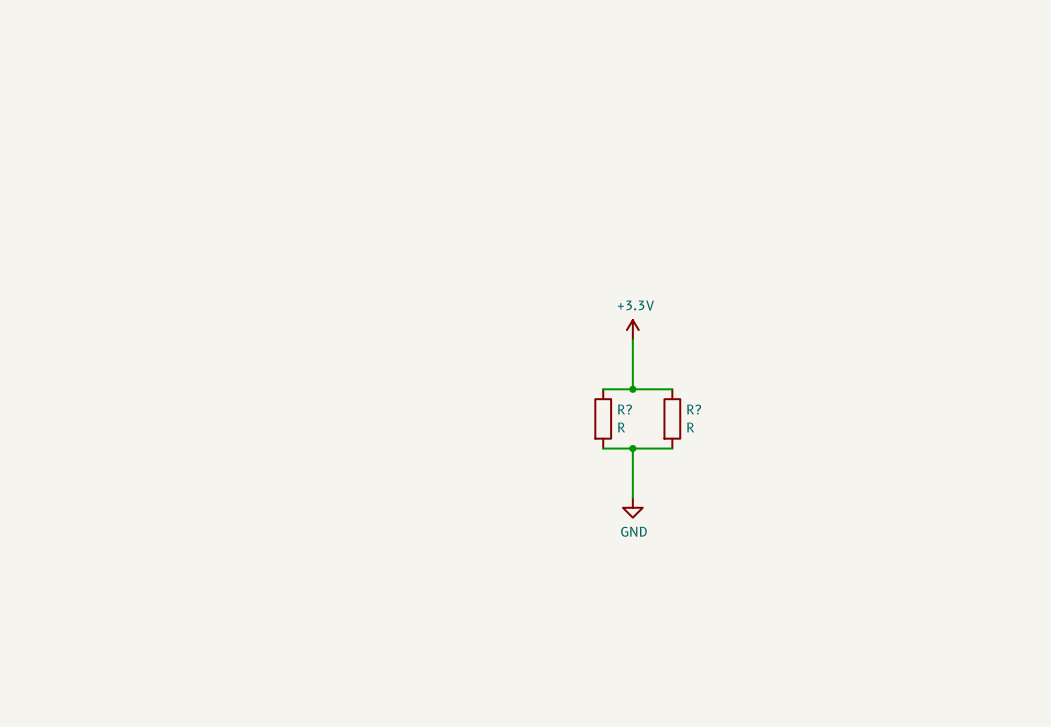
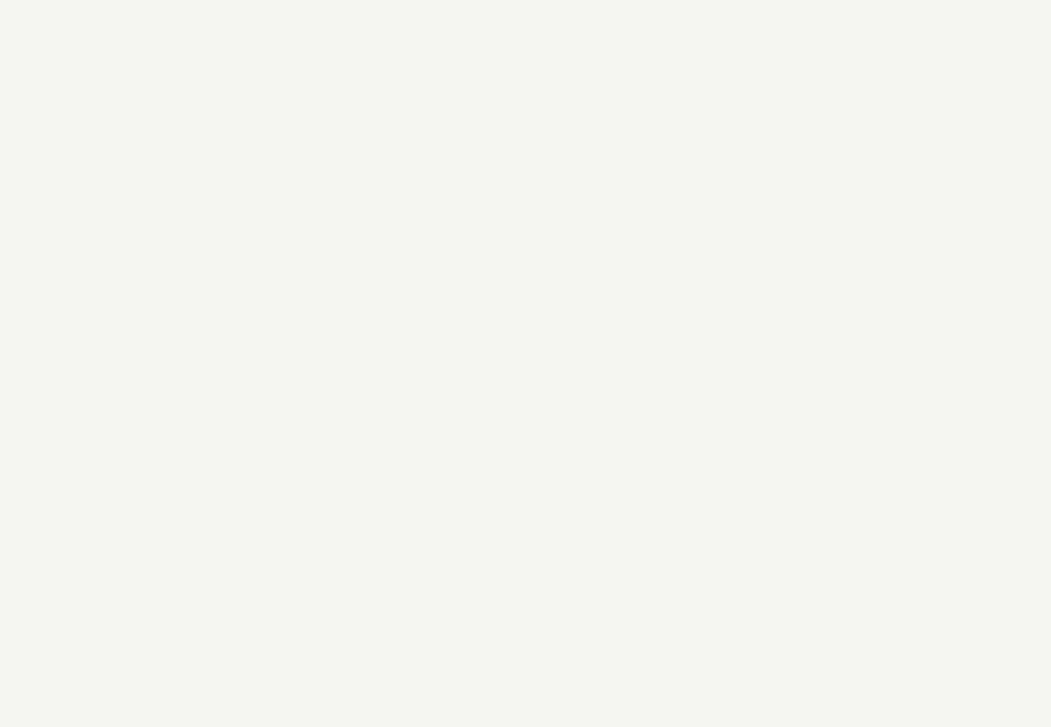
power symbol: +3.3V (632, 330) -> none
wire: (632, 339) (632, 389) -> none
wire: (603, 389) (672, 389) -> none
junction: (632, 389) -> none
R?: R (603, 418) -> none
R?: R (672, 418) -> none
wire: (603, 448) (672, 448) -> none
wire: (632, 448) (632, 497) -> none
junction: (632, 448) -> none
power symbol: GND (632, 507) -> none

